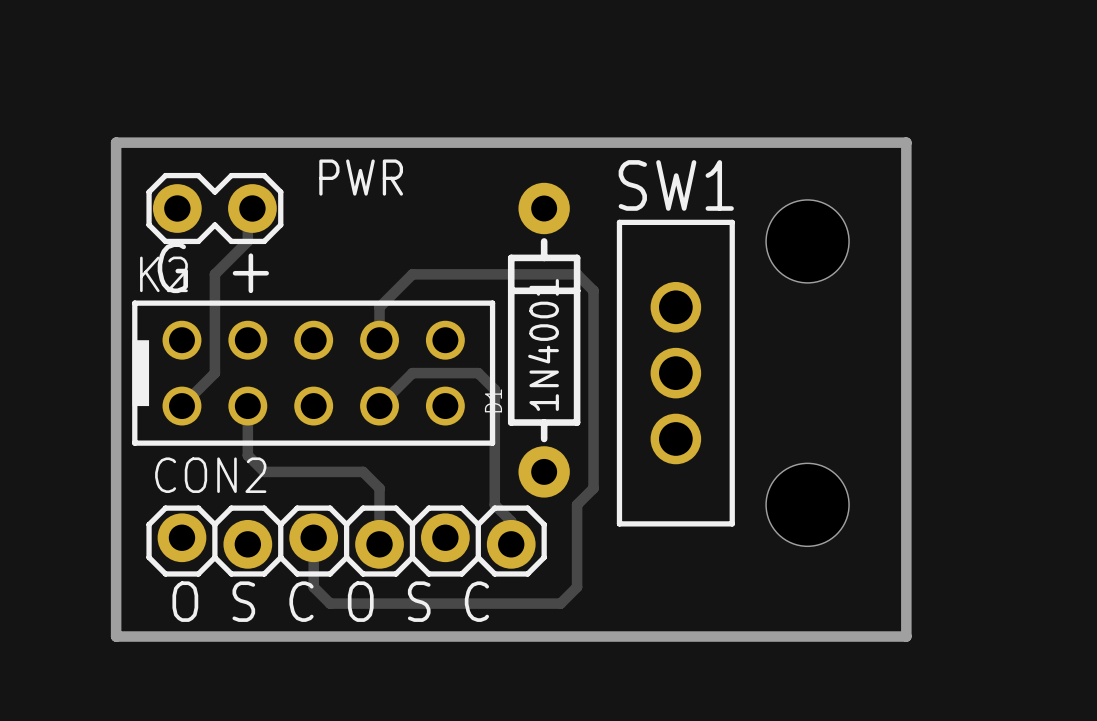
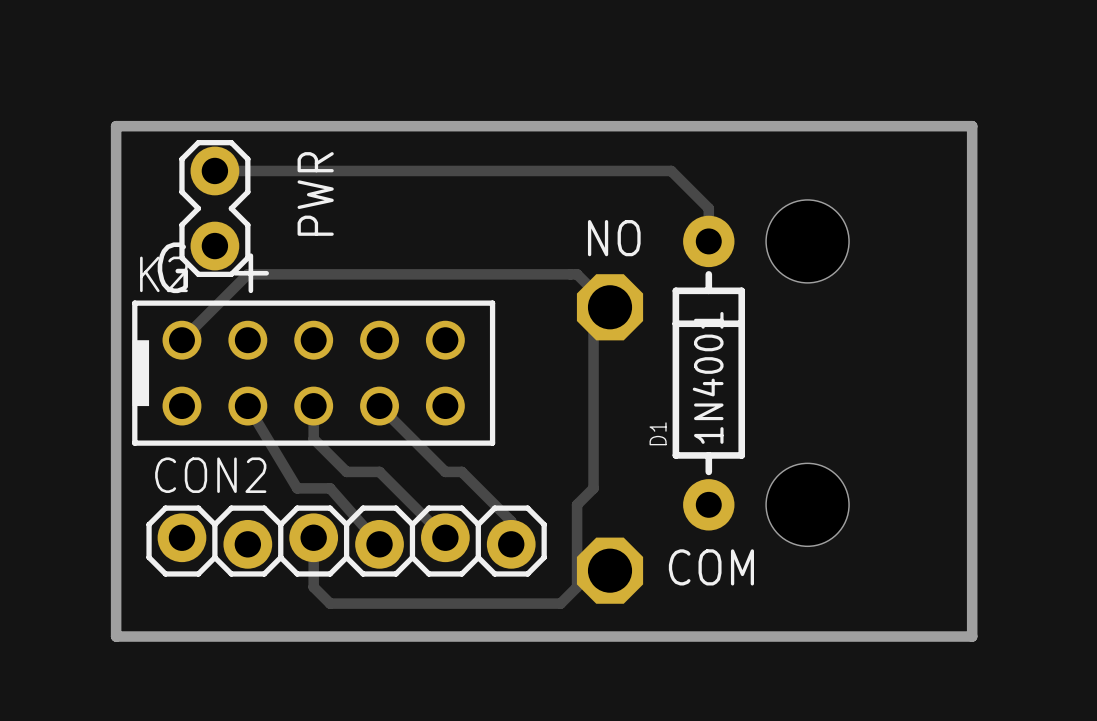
board edge: (116, 142) (906, 142) (906, 636) -> (116, 142) (116, 126) (972, 126) (972, 636) (906, 636)
track: none -> (214, 170) (671, 170) (708, 208) (708, 241)
PWR name position: PWR (361, 177) -> PWR (315, 193)
PWR rotation: 0° (214, 208) -> 90° clockwise (214, 208)
track: (247, 208) (247, 241) (214, 274) (214, 373) (181, 406) -> none
track: (412, 274) (379, 307) (379, 340) -> (412, 274) (247, 274) (181, 340)
NO: none -> (610, 307)
D1 position: (544, 340) -> (708, 373)
SW1: (675, 373) -> none
track: (247, 406) (247, 455) (264, 471) (346, 471) -> (313, 406) (313, 438) (346, 471)
track: none -> (247, 406) (297, 488) (330, 488) (379, 544)
track: (379, 406) (412, 373) (478, 373) (494, 389) (494, 504) -> (379, 406) (445, 471) (461, 471) (494, 504)
track: (363, 471) (379, 488) (379, 544) -> (363, 471) (379, 471) (445, 537)
COM: none -> (610, 570)
text: O S C O S C (330, 601) -> none

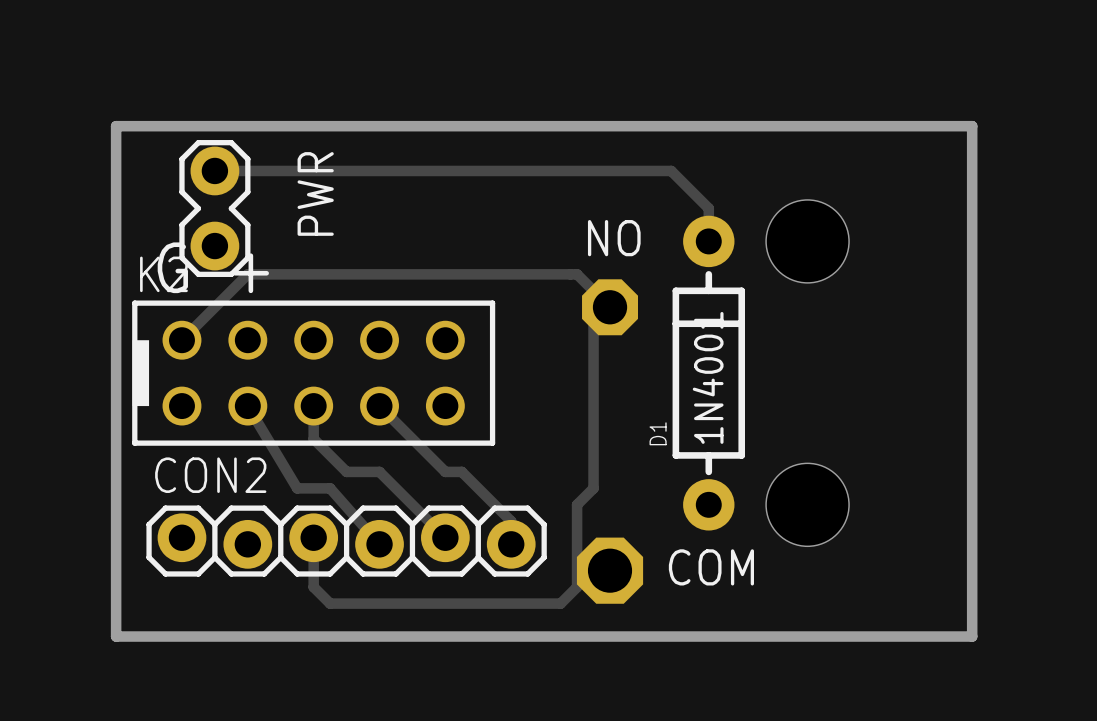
NO footprint: [576, 274, 644, 341] -> [582, 279, 639, 336]

